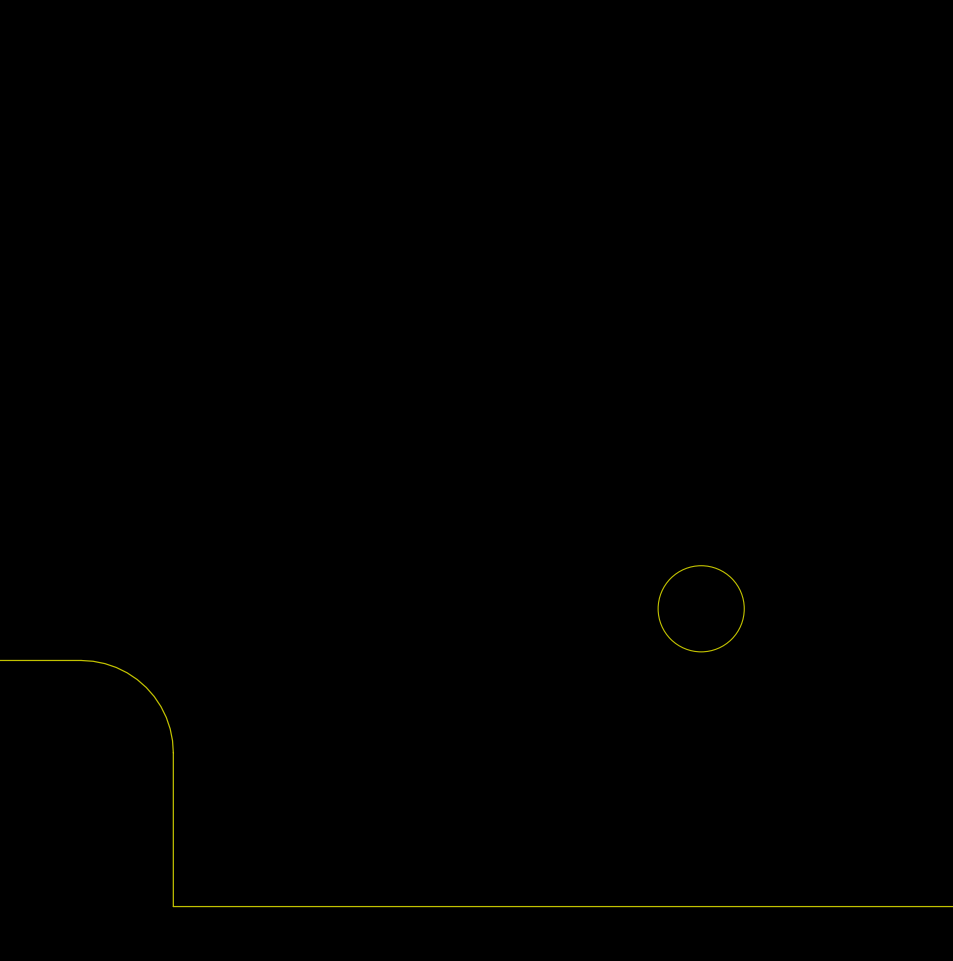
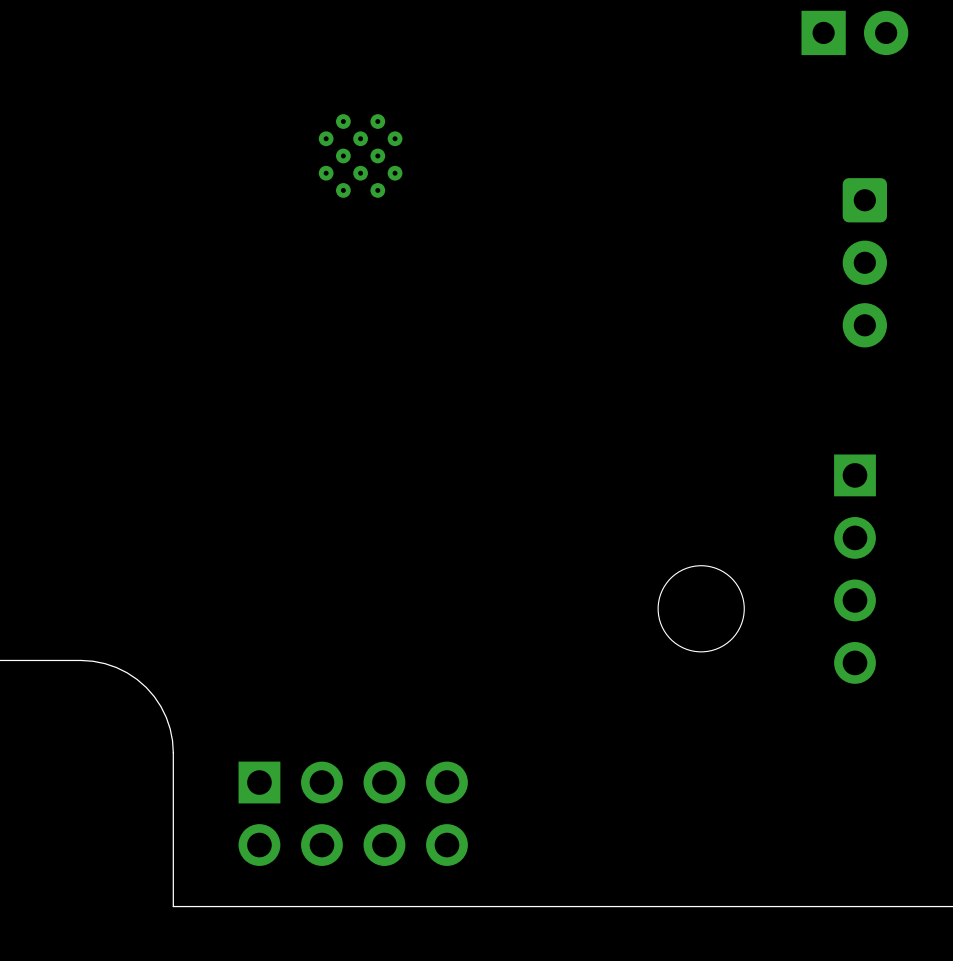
part: none -> (854, 32)
part: none -> (360, 155)
part: none -> (864, 262)
part: none -> (855, 569)
part: none -> (353, 813)

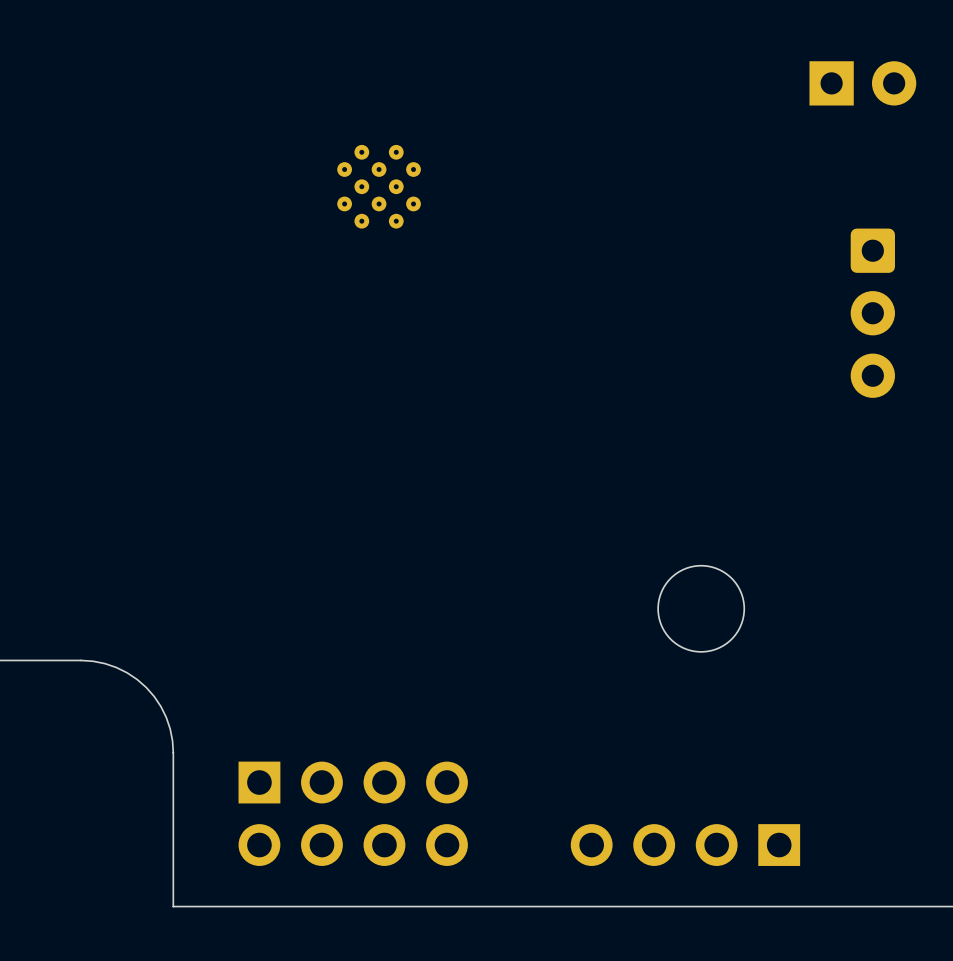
part position: (854, 32) -> (862, 83)
part position: (360, 155) -> (379, 186)
part position: (864, 262) -> (872, 313)
part rotation: 0° (855, 569) -> 90° clockwise (685, 845)
part position: (855, 569) -> (685, 845)

